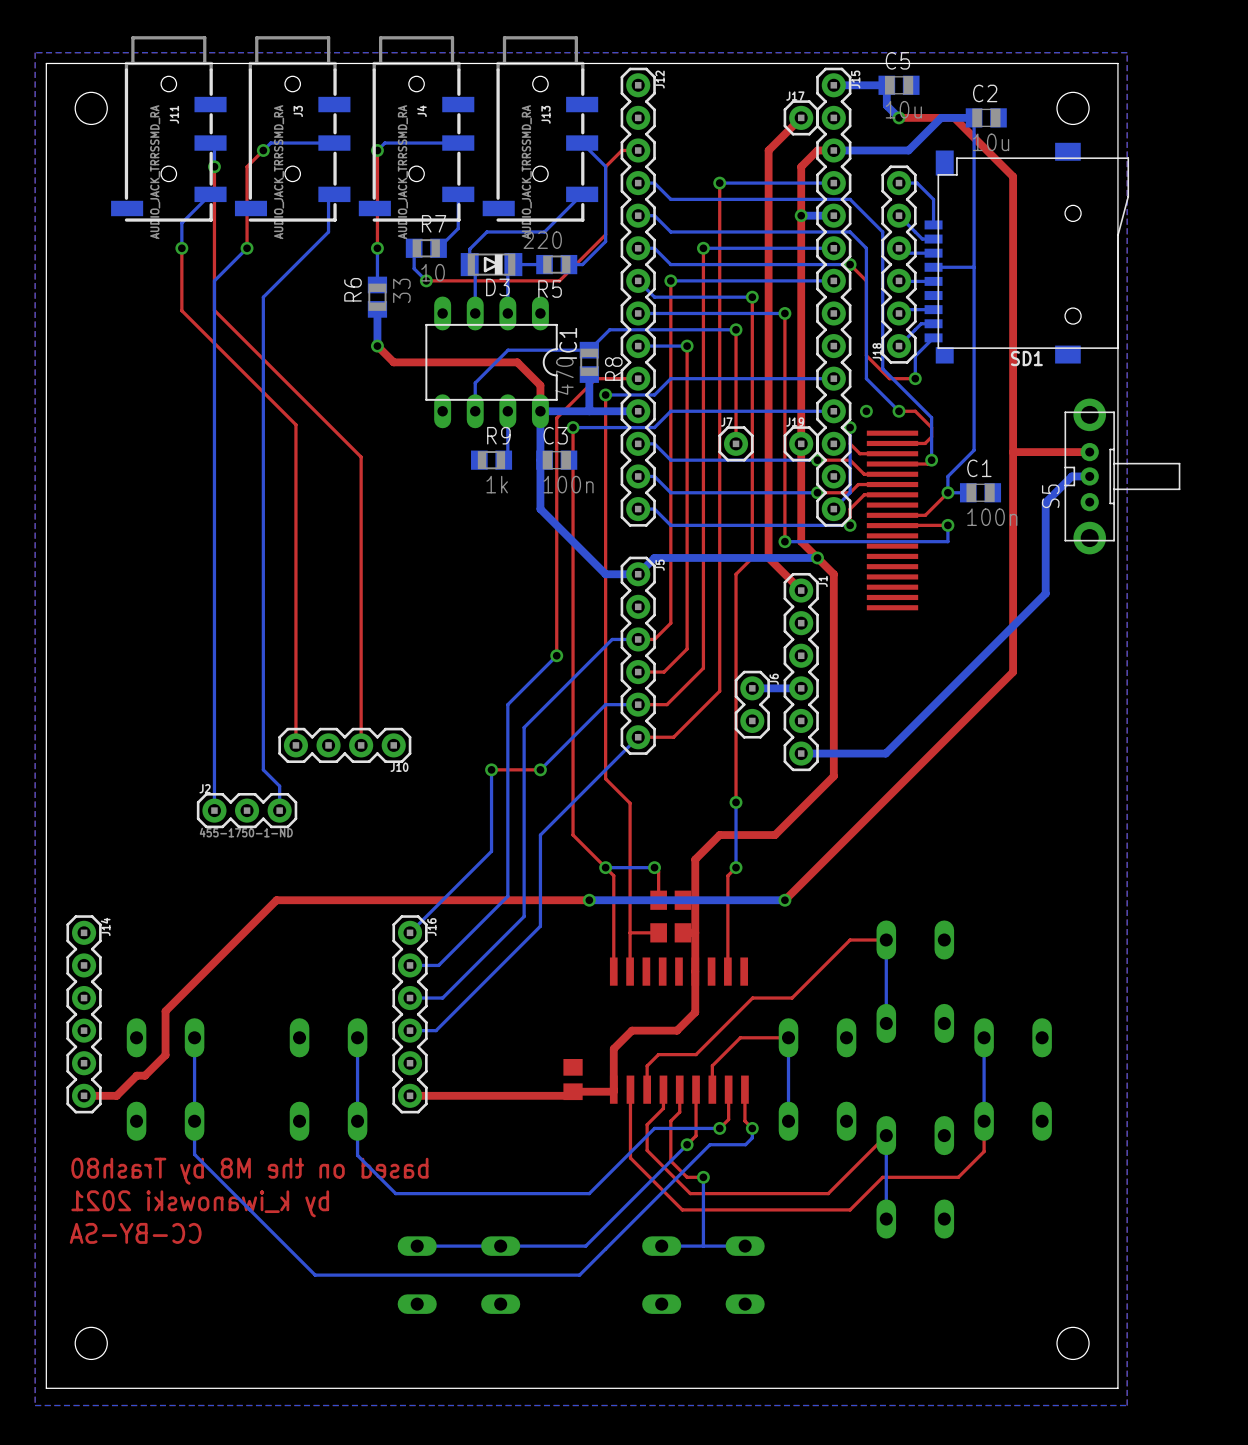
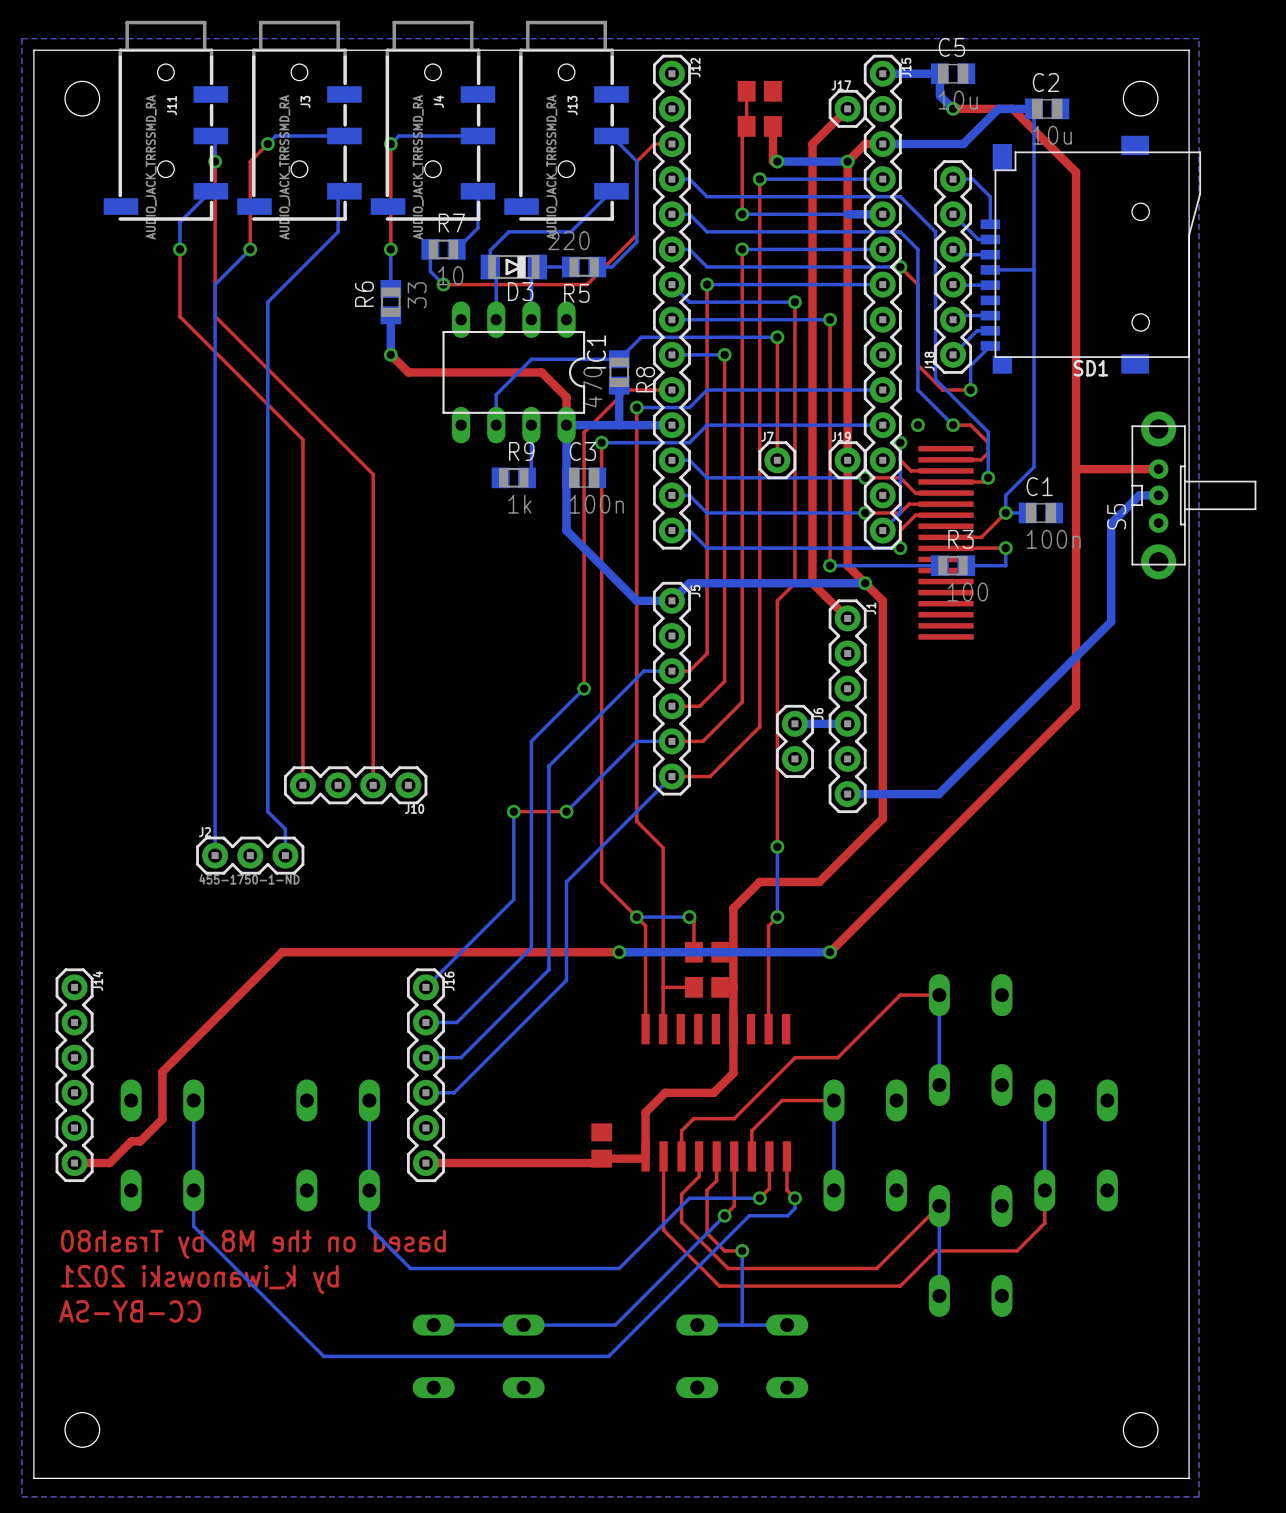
top track: none -> (746, 91) (746, 126) (742, 126) (742, 214)
part: none -> (759, 91)
part: none -> (759, 126)
top track: none -> (772, 126) (772, 161) (777, 161)
via: none -> (777, 161)
bottom track: none -> (847, 161) (777, 161)
via: none -> (847, 161)
via: none -> (742, 214)
bottom track: none -> (847, 214) (742, 214)
via: (801, 215) -> none
R3: none -> 100 (953, 565)
bottom track: (911, 541) (886, 541) -> none

